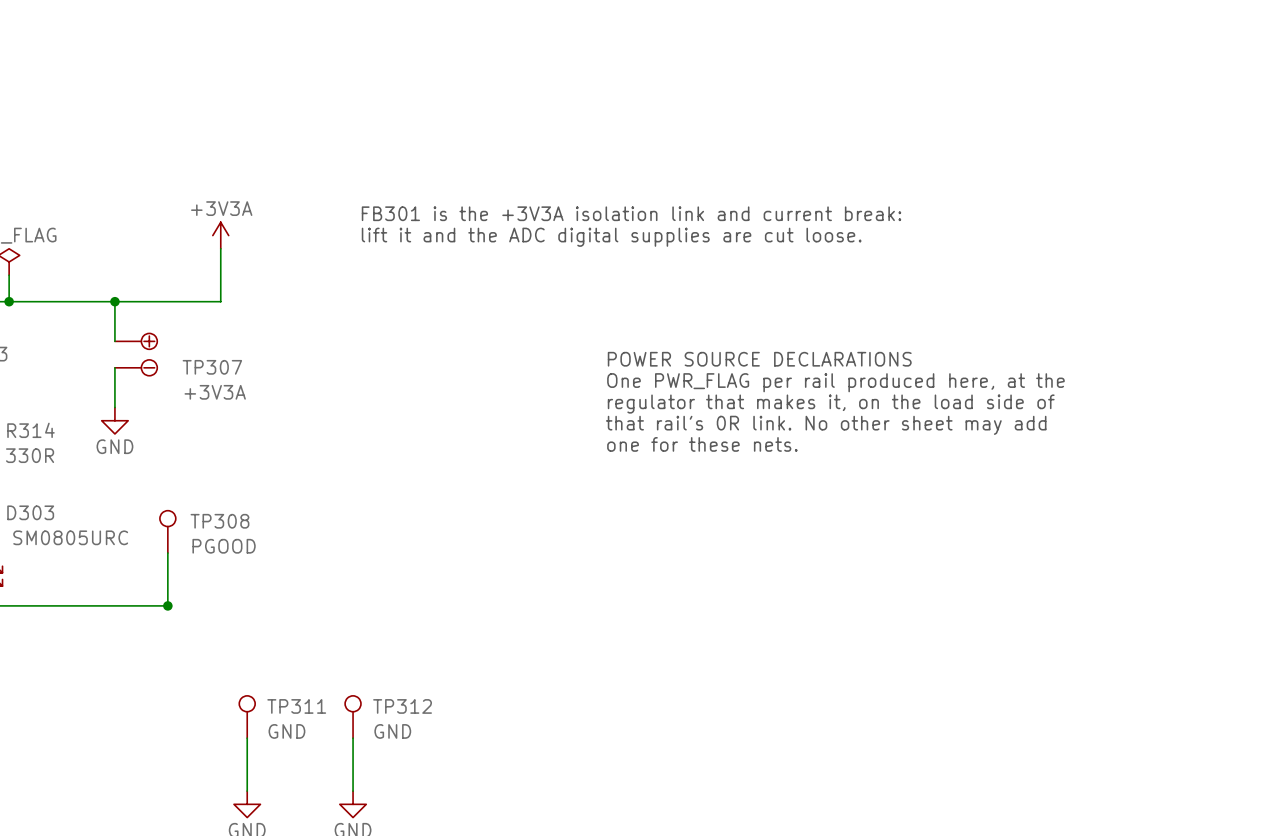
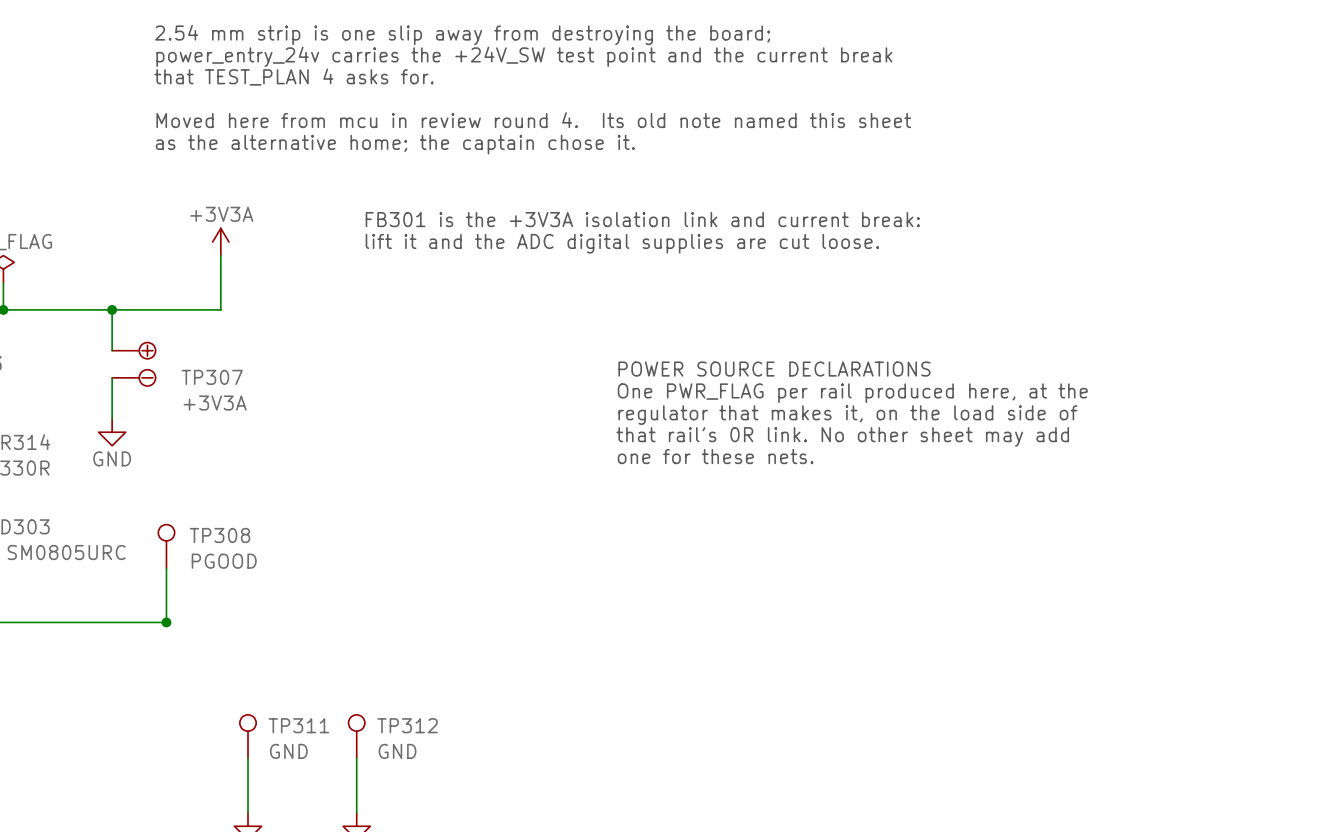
text: none -> 2.54 mm strip is one slip away from destroying the board; (462, 34)
text: none -> power_entry_24v carries the +24V_SW test point and the current break (524, 56)
text: none -> that TEST_PLAN 4 asks for. (294, 77)
text: none -> Moved here from mcu in review round 4. Its old note named this sheet (533, 120)
text: none -> as the alternative home; the captain chose it. (395, 144)

